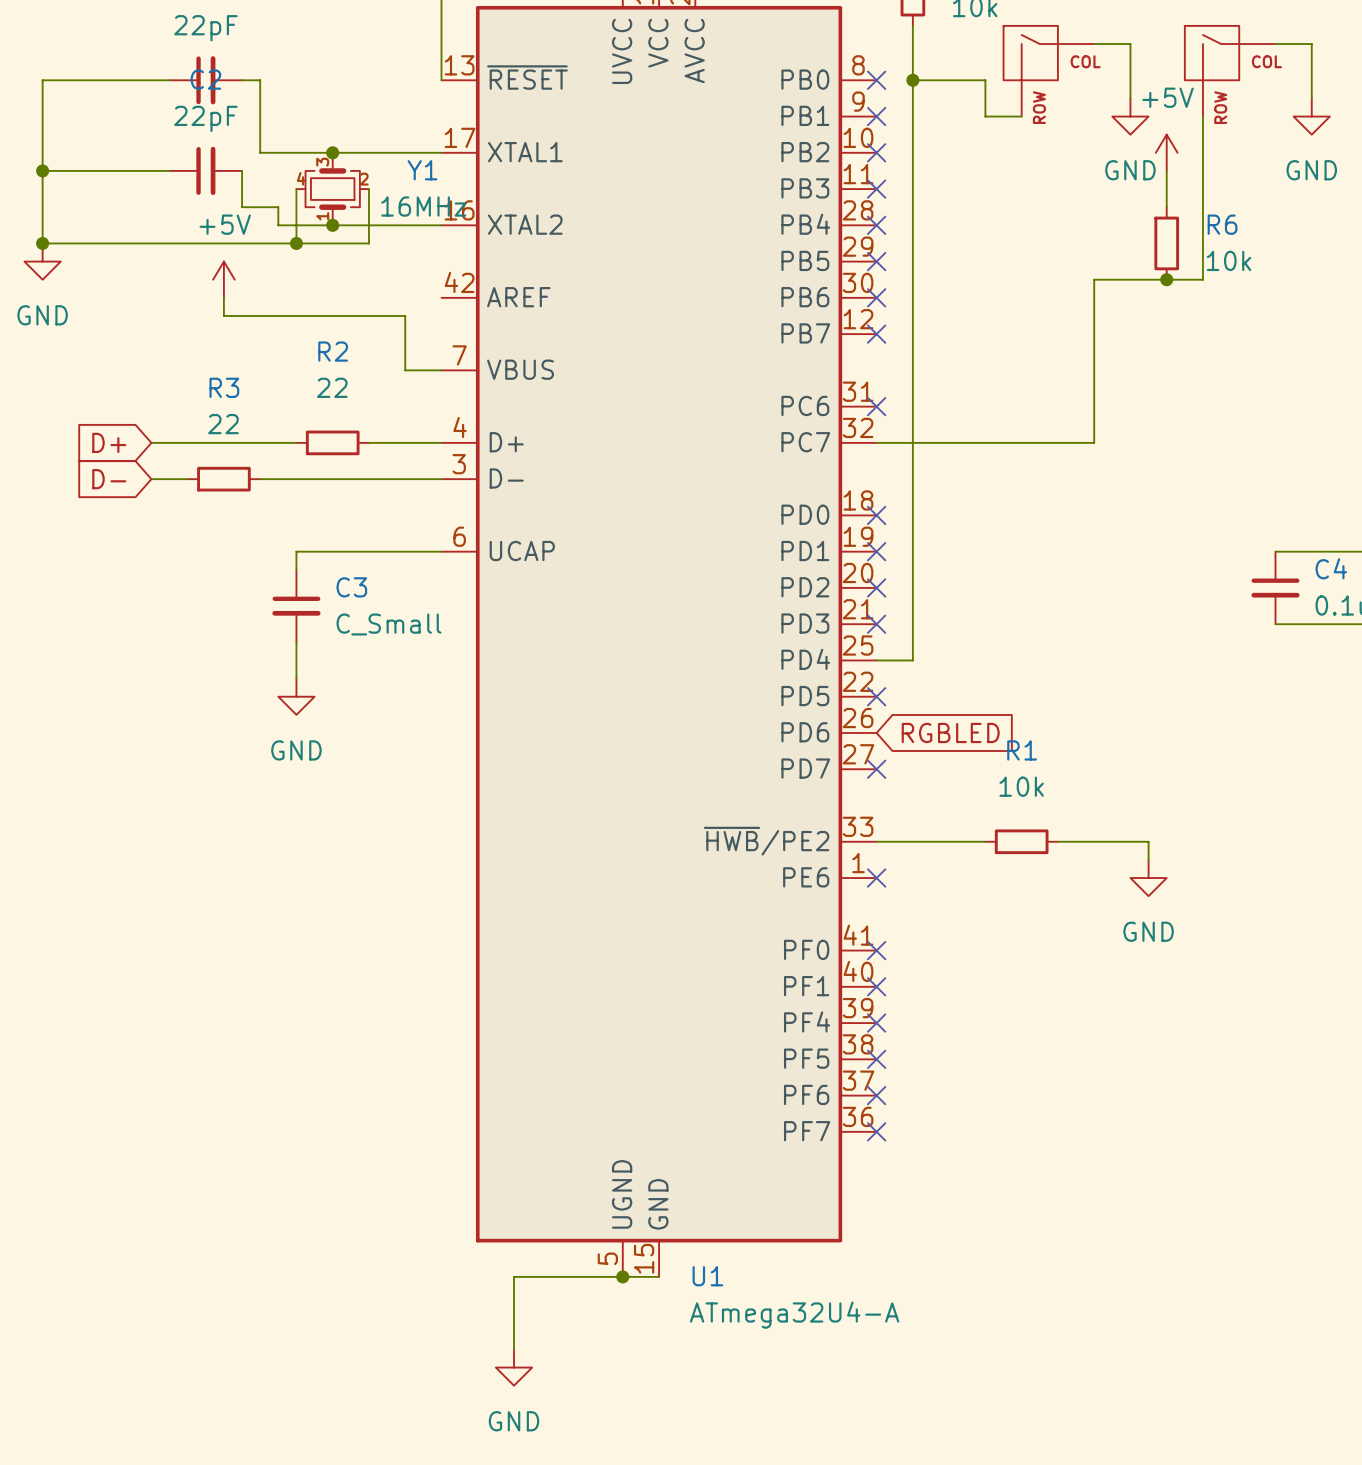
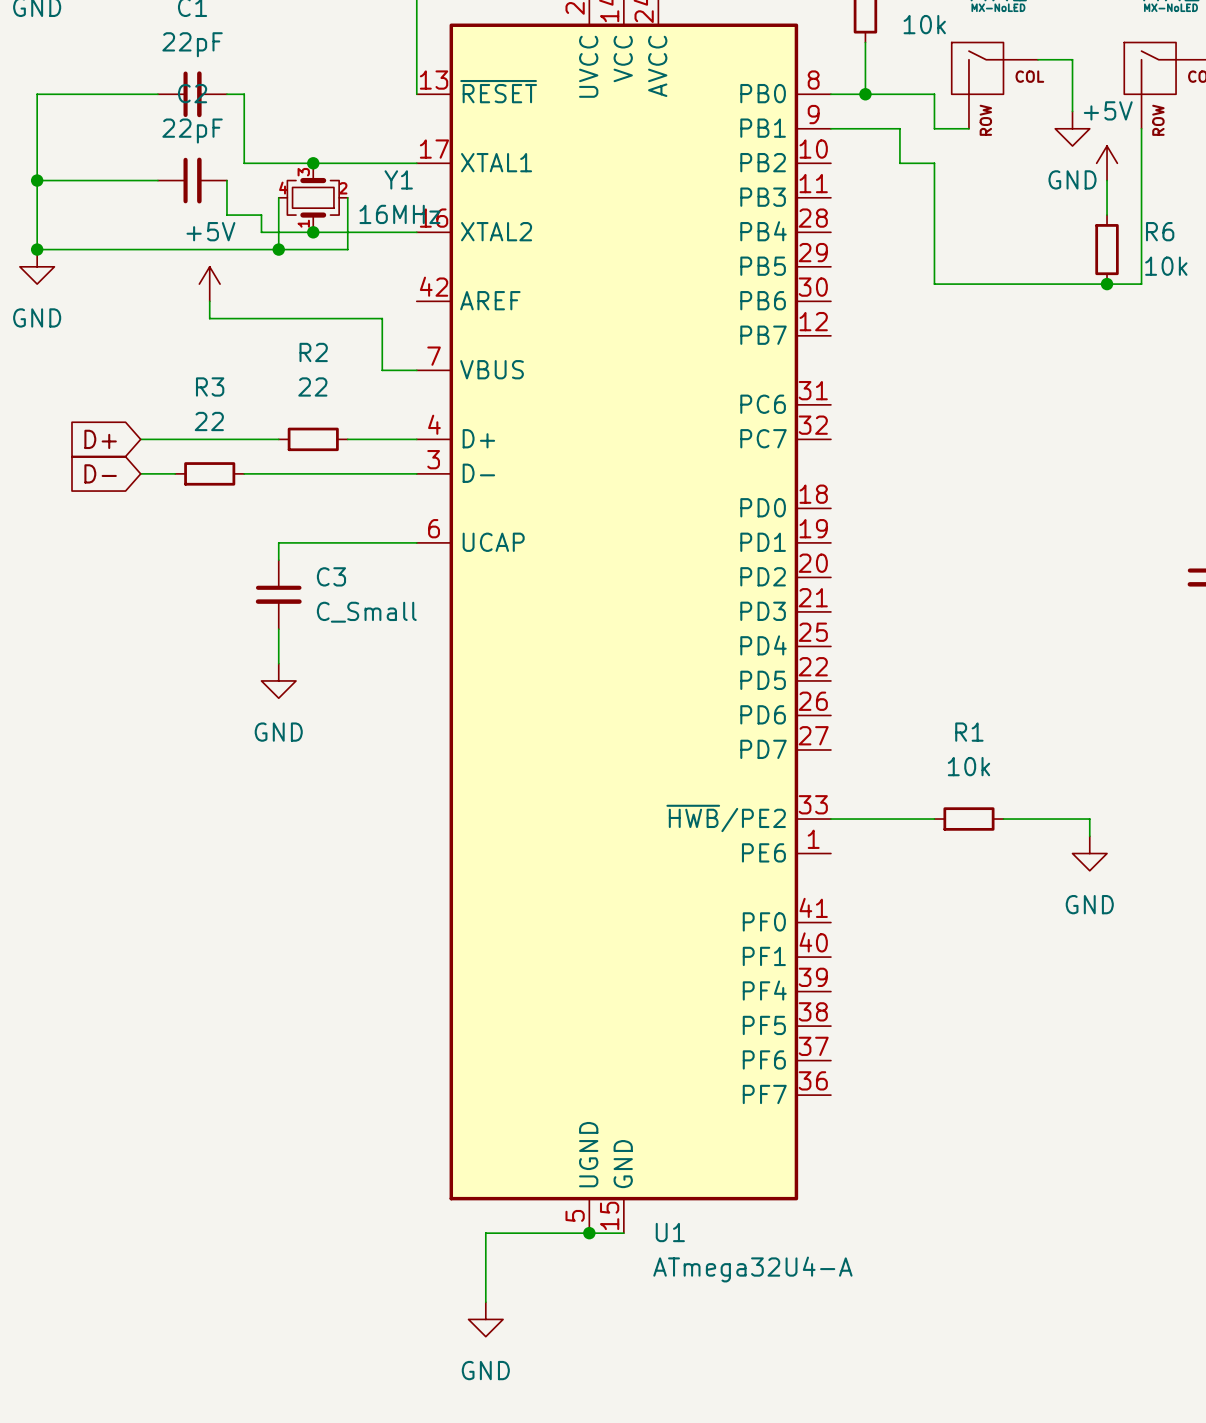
no-connect mark: (876, 80) -> none
wire: (912, 80) (912, 660) (876, 660) -> (865, 94) (830, 94)
no-connect mark: (876, 116) -> none
no-connect mark: (876, 152) -> none
no-connect mark: (876, 189) -> none
no-connect mark: (876, 225) -> none
no-connect mark: (876, 261) -> none
wire: (1094, 279) (1094, 442) (876, 442) -> (1038, 284) (934, 284) (934, 163) (899, 163) (899, 128) (830, 128)
no-connect mark: (876, 297) -> none
no-connect mark: (876, 334) -> none
no-connect mark: (876, 406) -> none
no-connect mark: (876, 515) -> none
no-connect mark: (876, 551) -> none
no-connect mark: (876, 587) -> none
no-connect mark: (876, 624) -> none
no-connect mark: (876, 696) -> none
global label: RGBLED (950, 732) -> none
no-connect mark: (876, 769) -> none
no-connect mark: (876, 878) -> none
no-connect mark: (876, 950) -> none
no-connect mark: (876, 986) -> none
no-connect mark: (876, 1023) -> none
no-connect mark: (876, 1059) -> none
no-connect mark: (876, 1095) -> none
no-connect mark: (876, 1131) -> none

